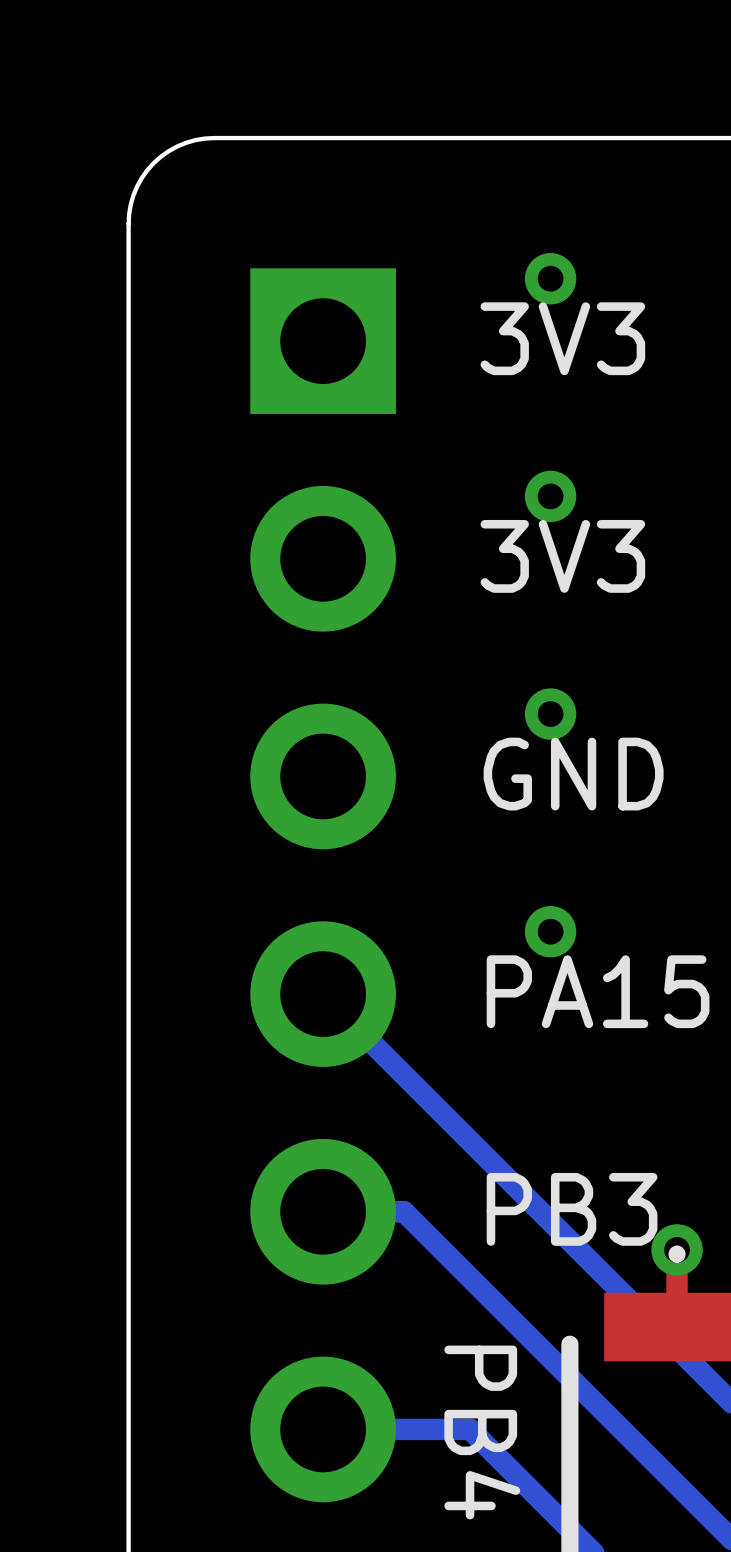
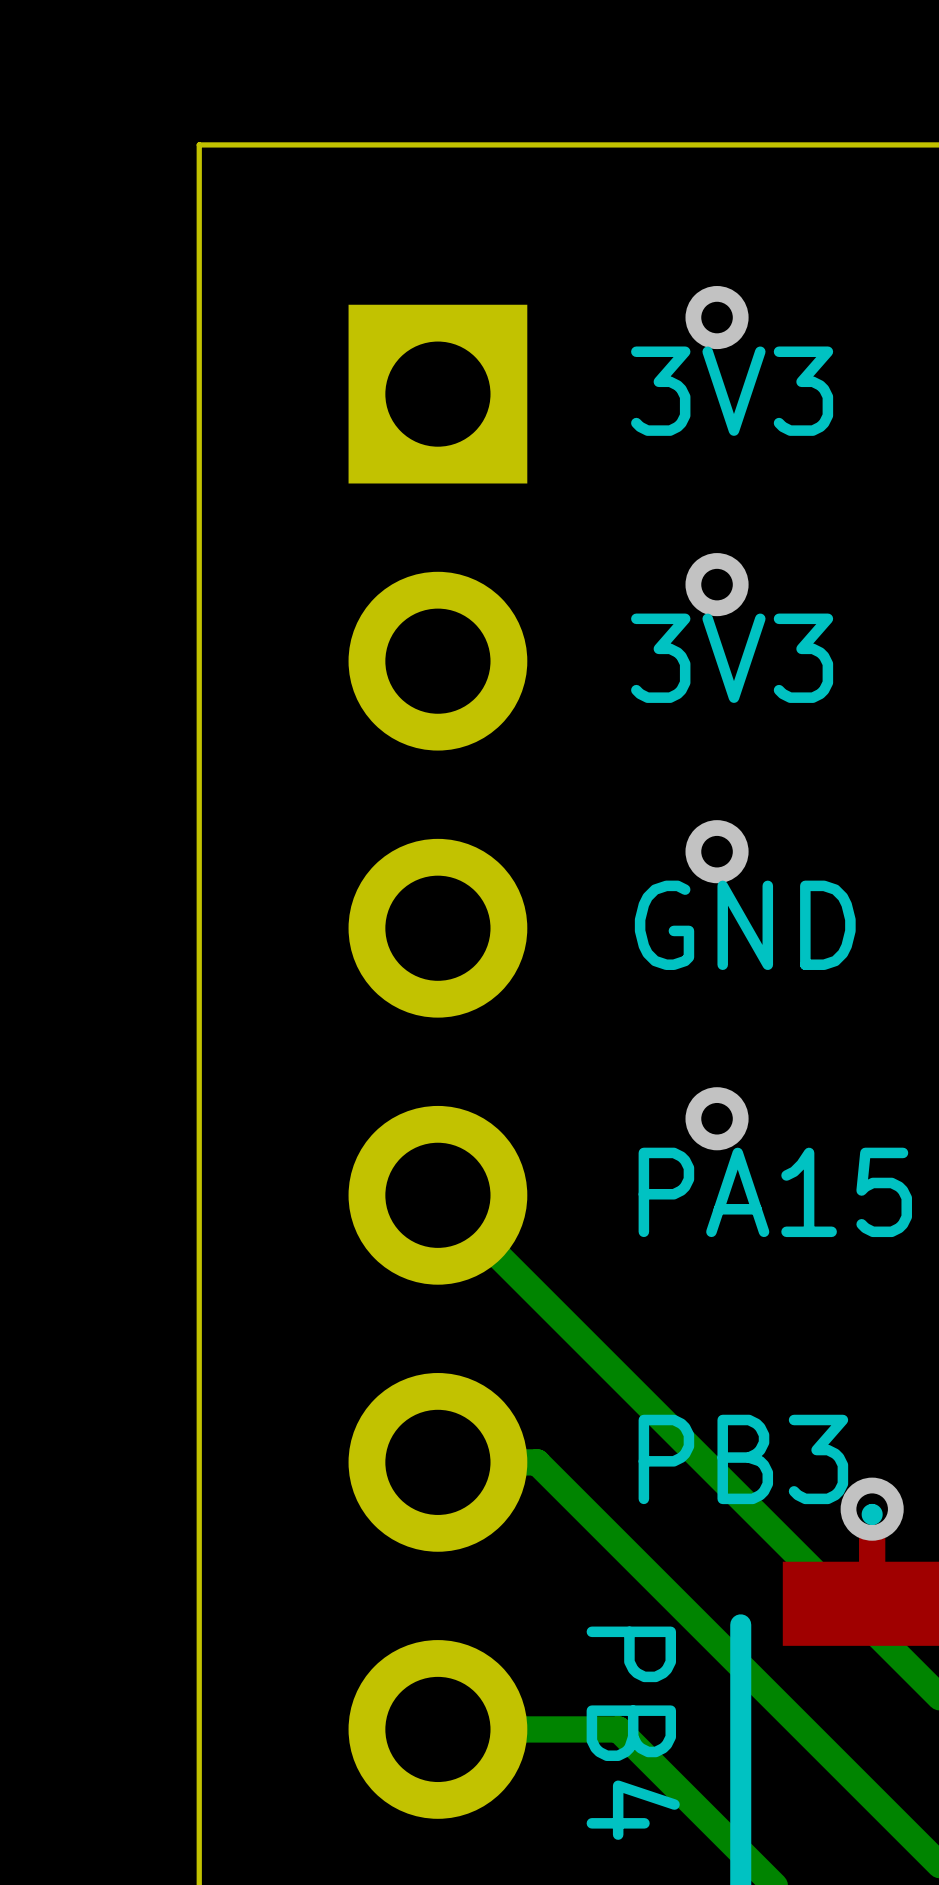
board edge: (214, 138) (195, 140) (177, 146) (153, 163) (141, 178) (133, 195) (128, 223) -> (304, 144) (199, 144) (199, 250)

